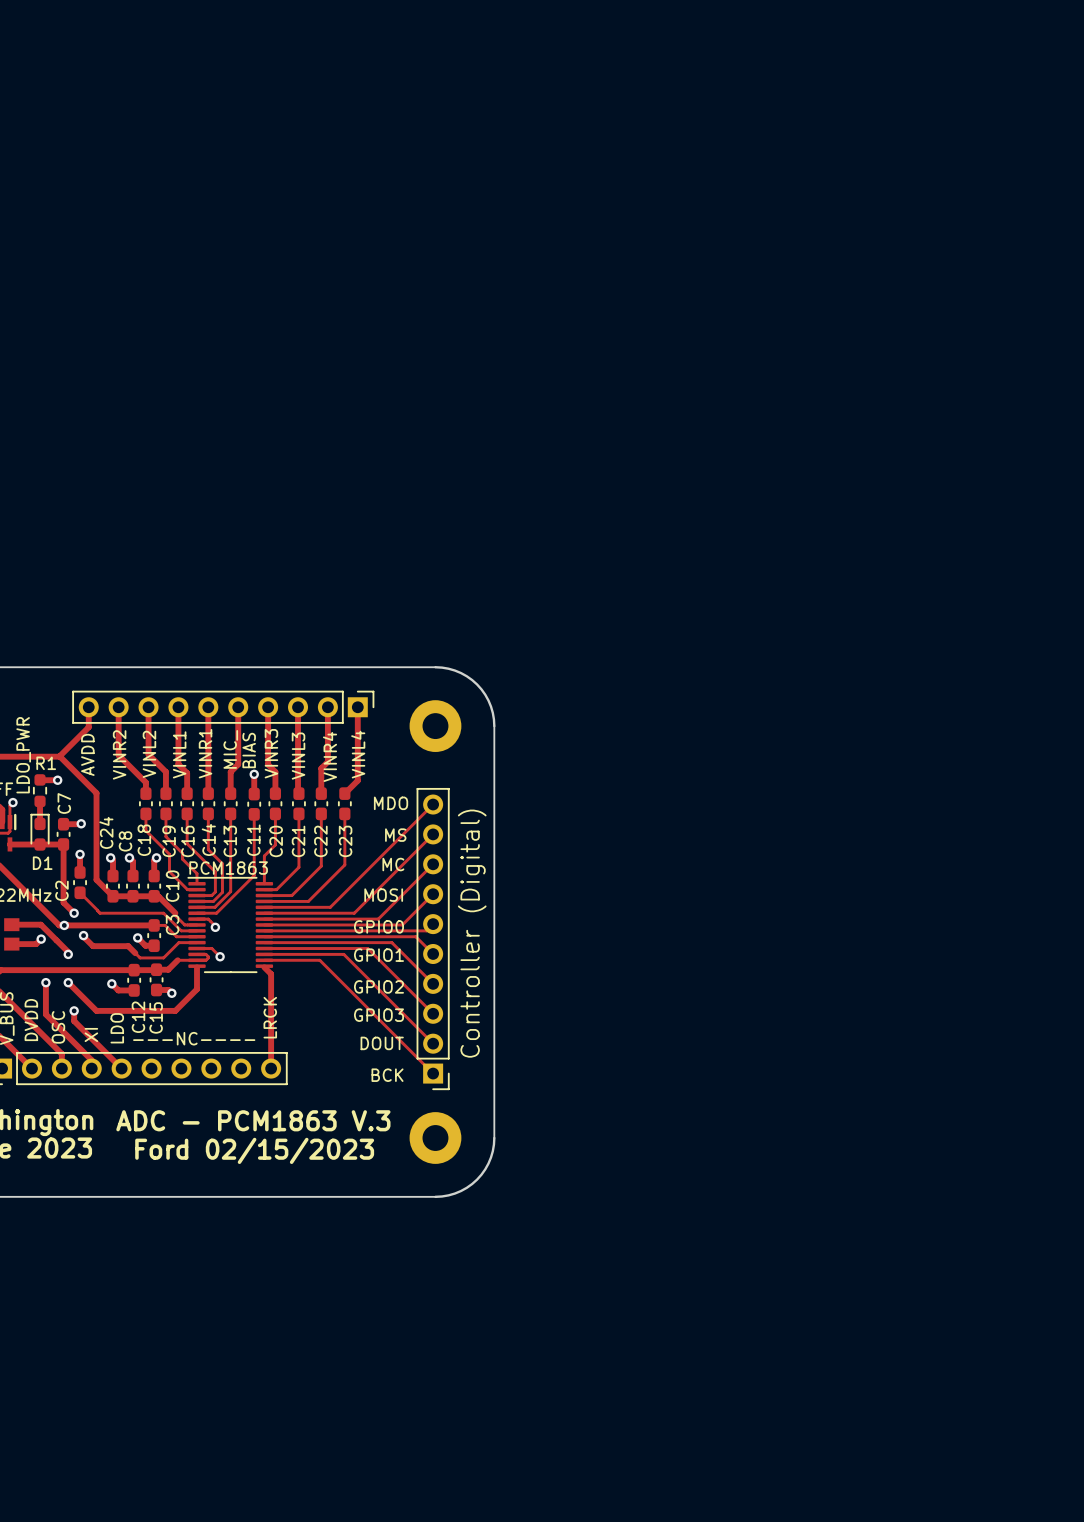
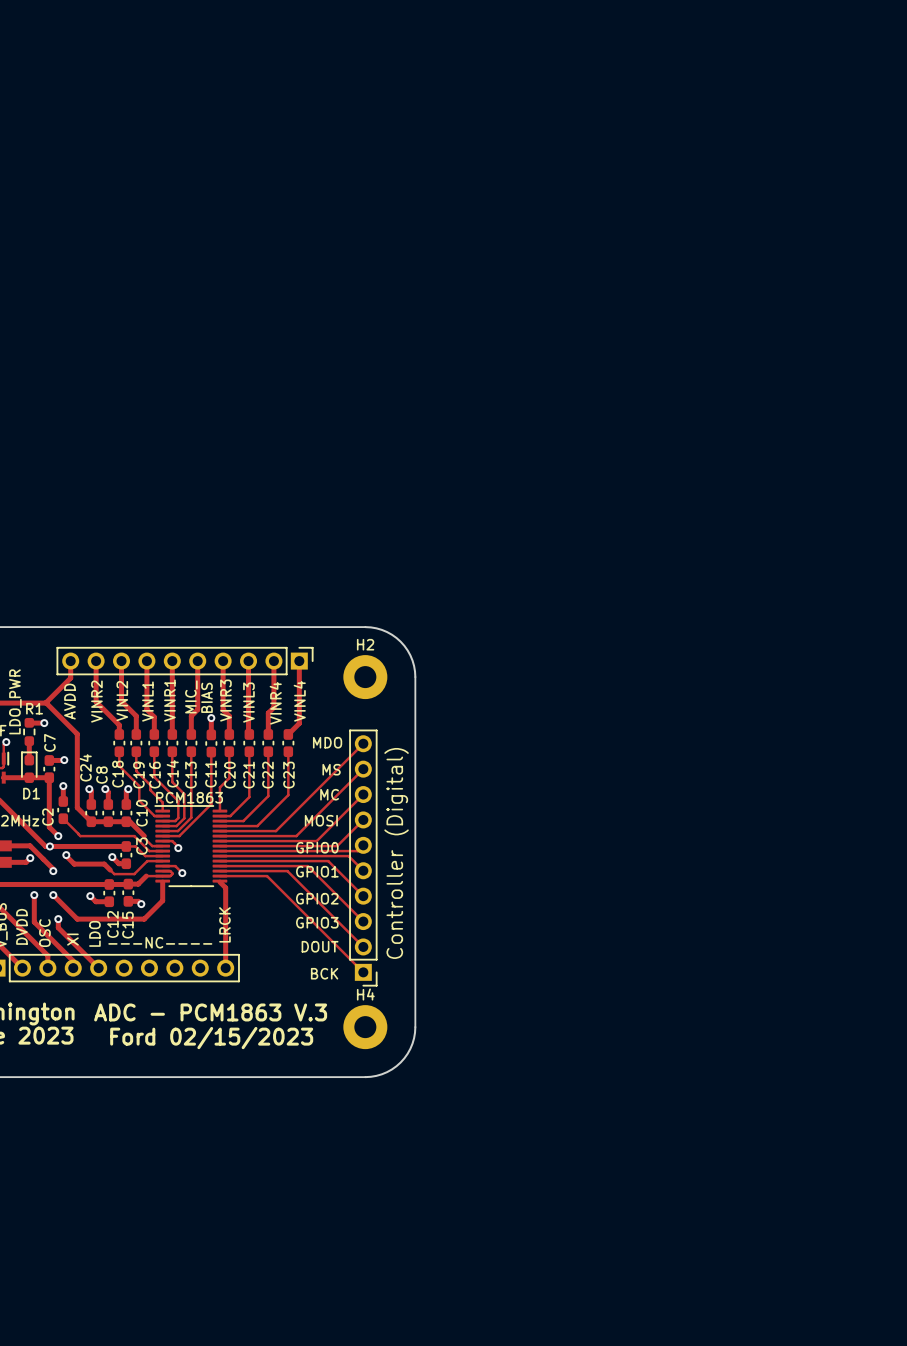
H2 name: none -> H2 (365, 644)
H4 name: none -> H4 (365, 994)

